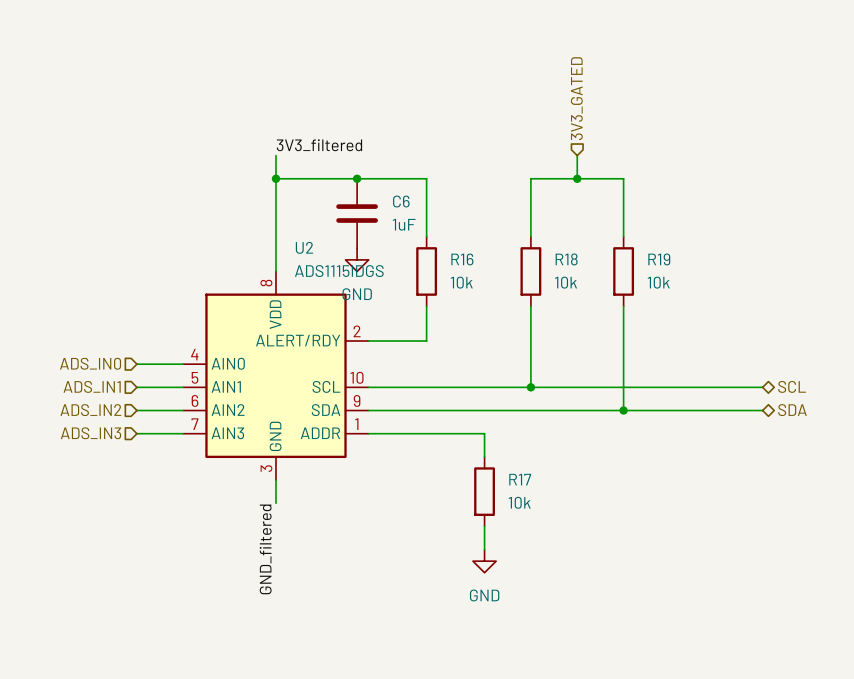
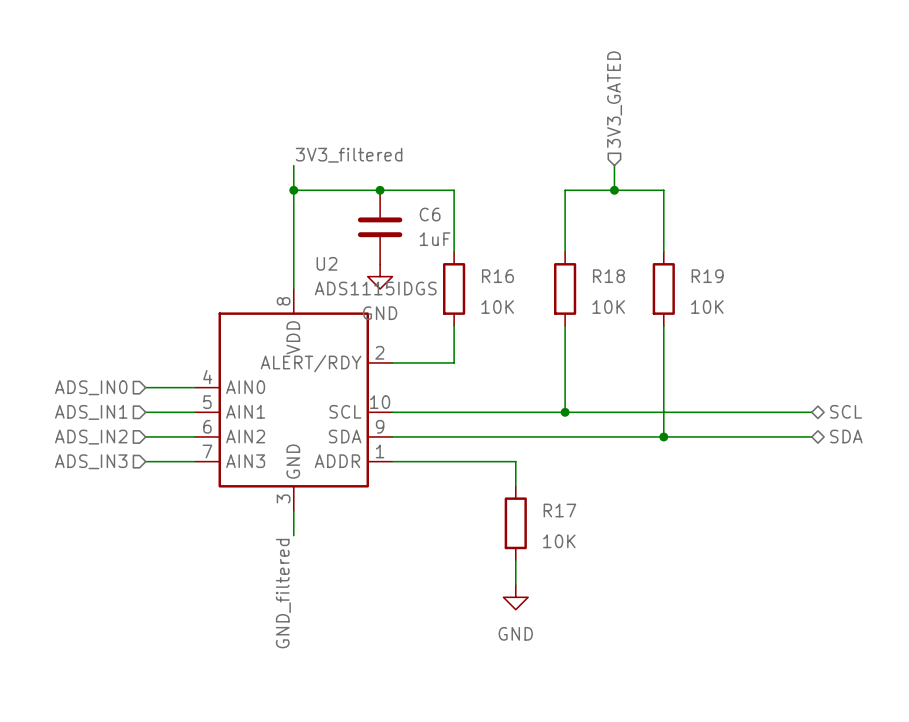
R16 value: 10k (461, 282) -> 10K (497, 307)
R18 value: 10k (566, 282) -> 10K (608, 307)
R19 value: 10k (658, 282) -> 10K (707, 307)
R17 value: 10k (519, 502) -> 10K (559, 541)

